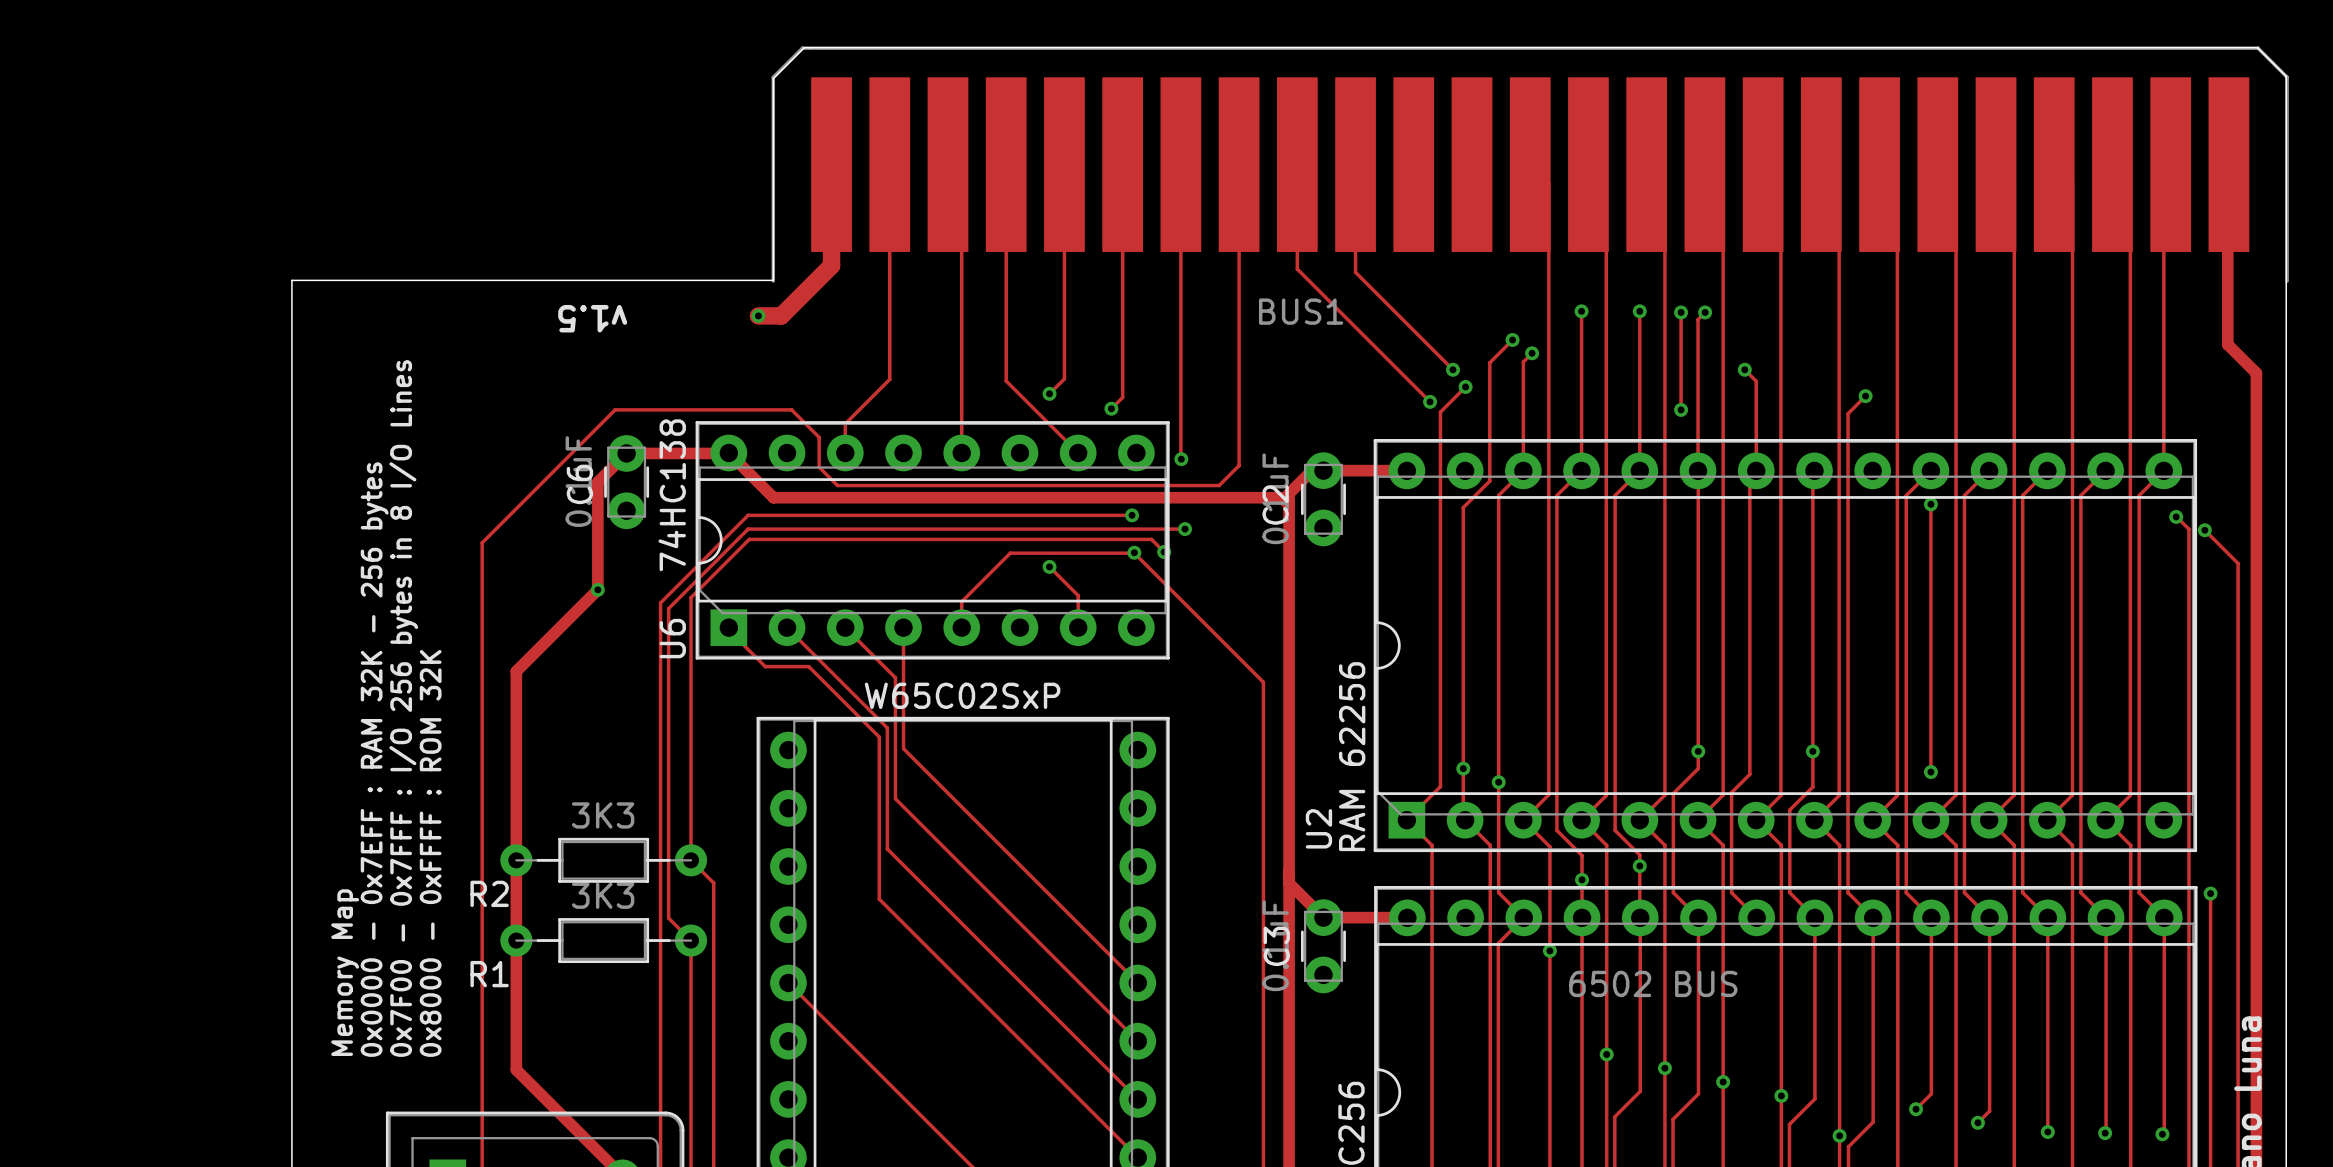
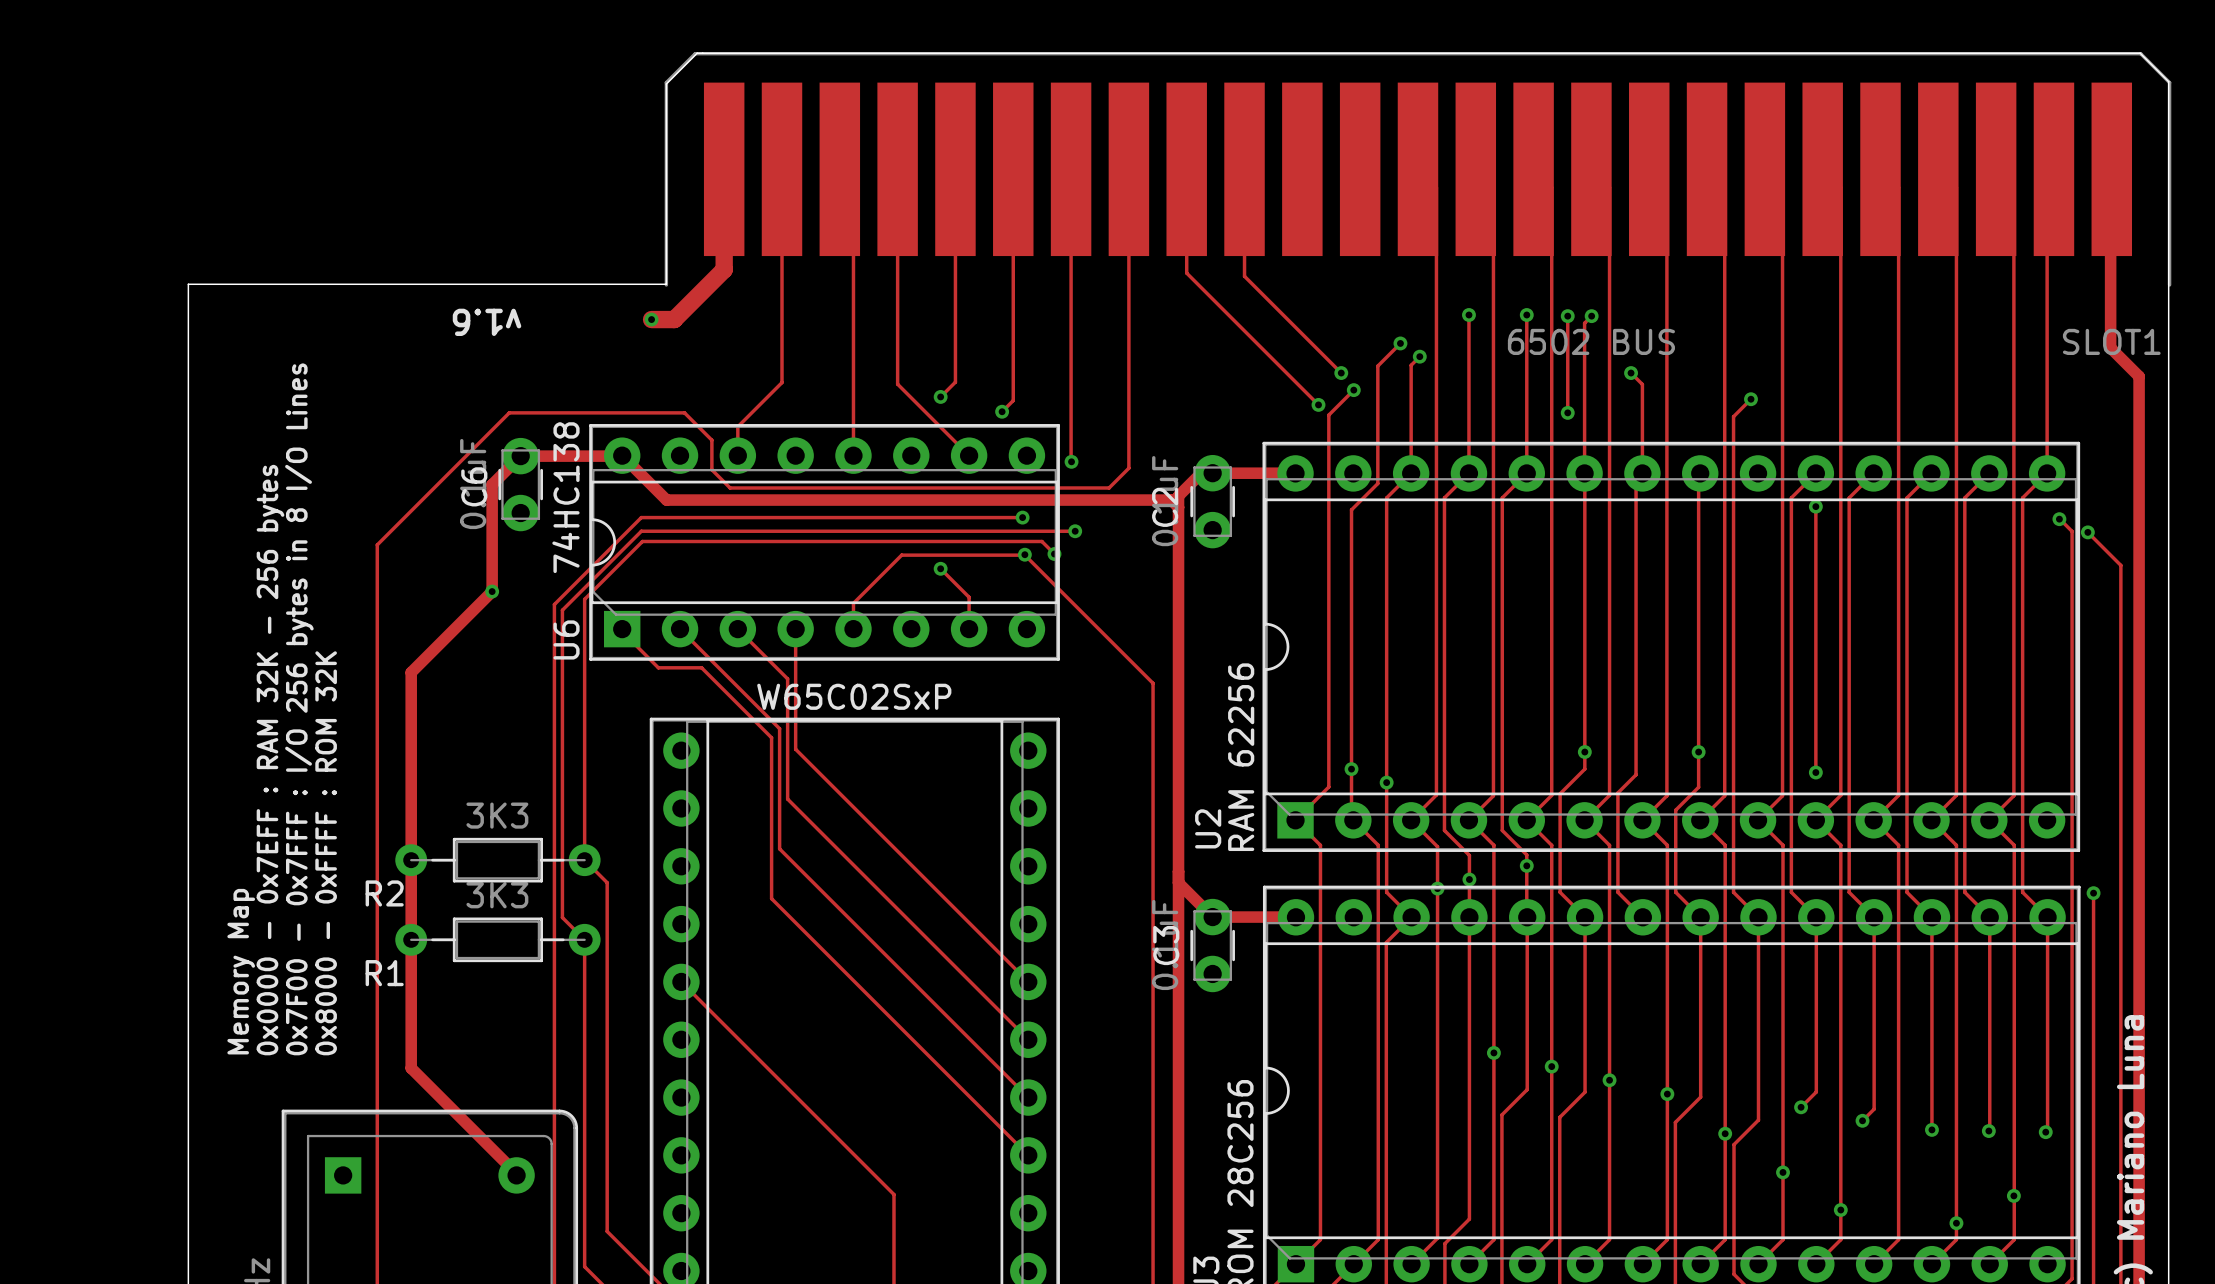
BUS1 name: BUS1 (1301, 311) -> SLOT1 (2111, 341)
text: v1.5 (592, 318) -> v1.6 (487, 322)
via position: (1549, 950) -> (1437, 888)
BUS1 value position: 6502 BUS (1653, 983) -> 6502 BUS (1591, 341)

